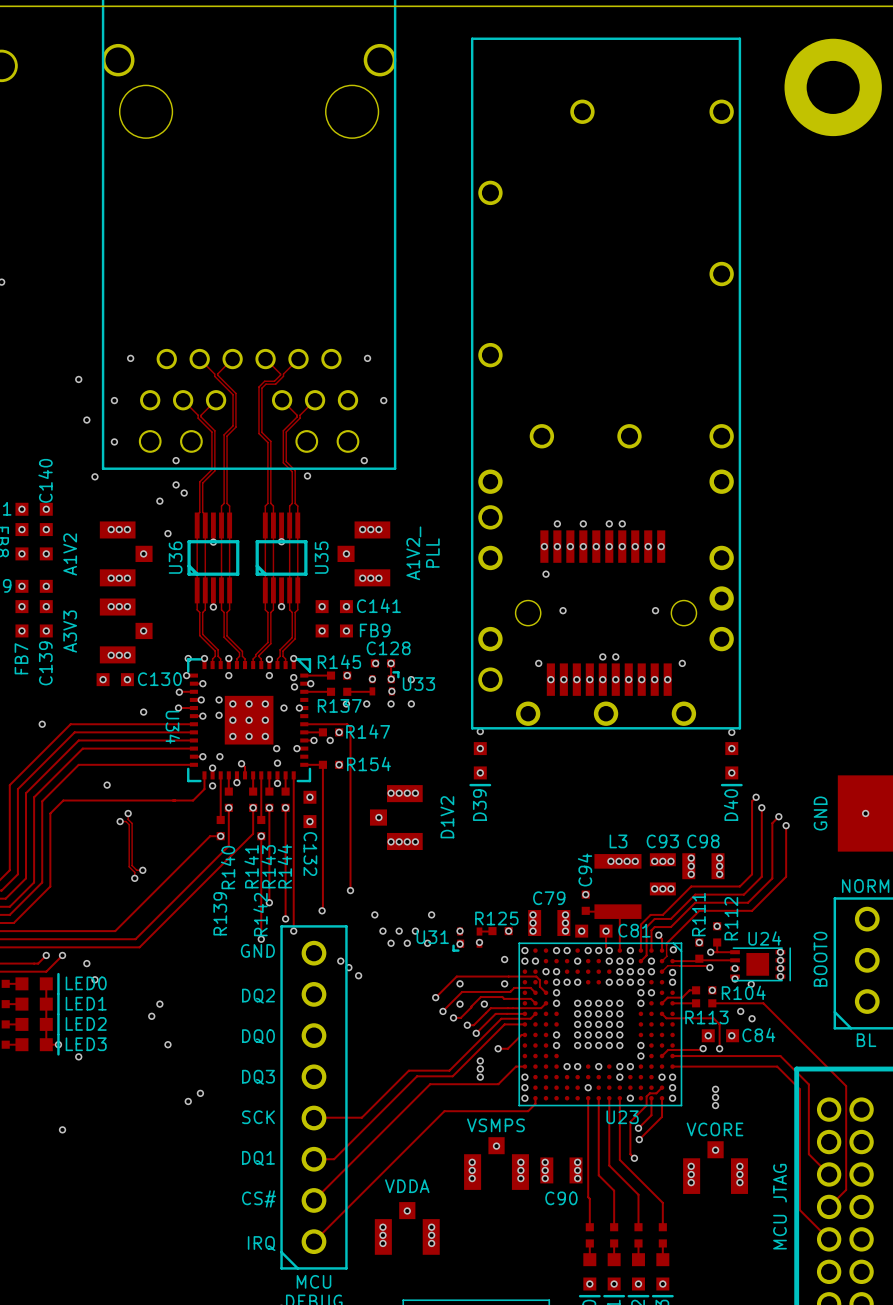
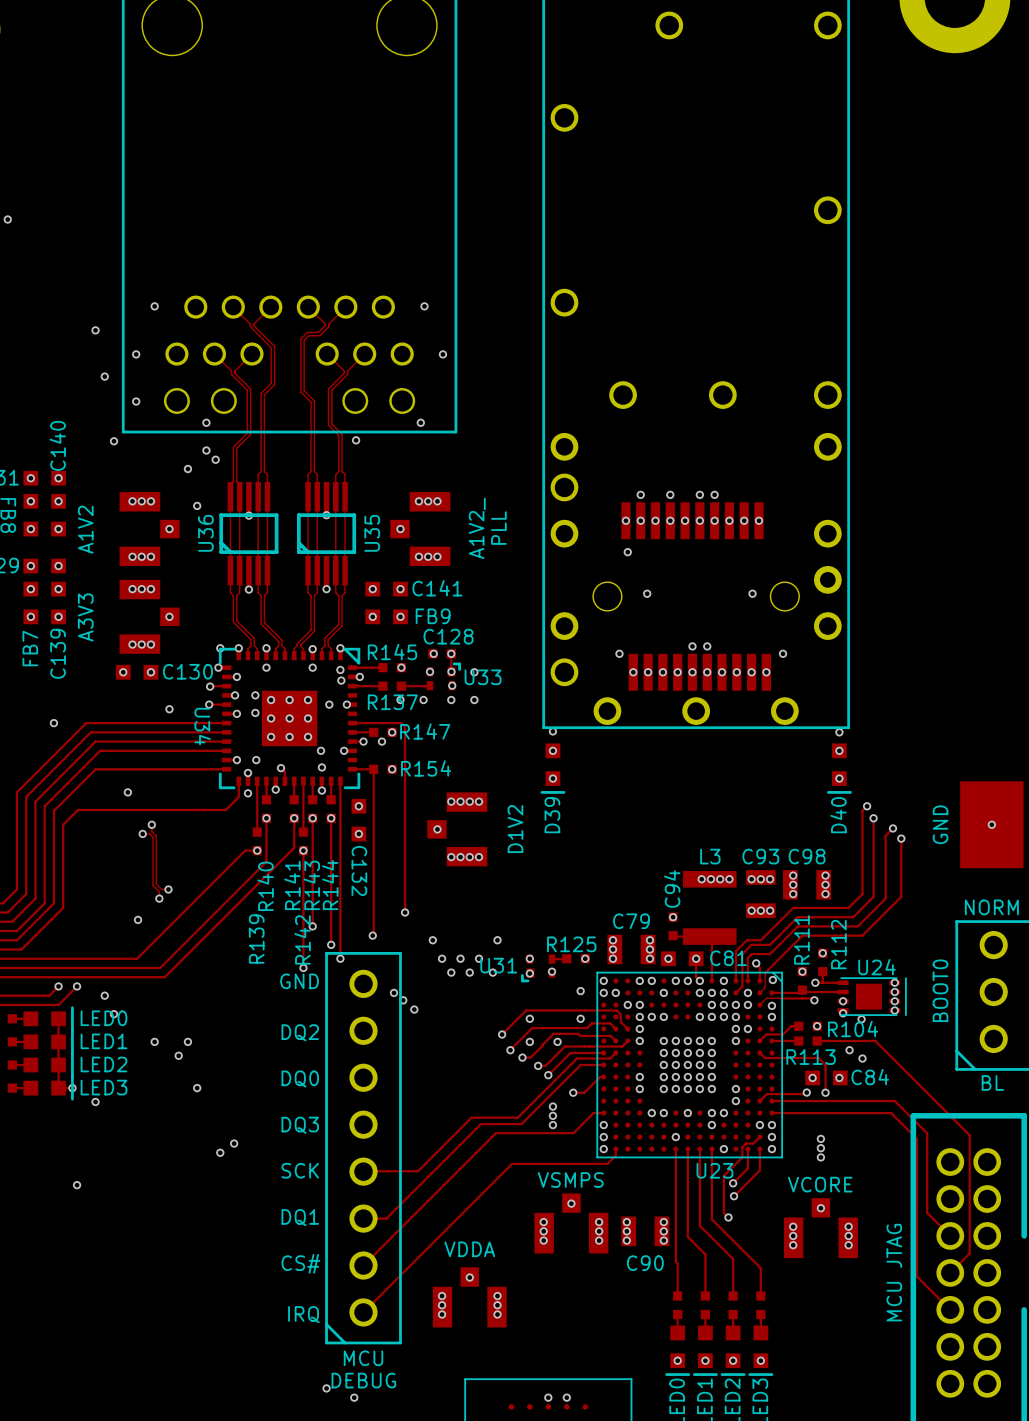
via: none -> (138, 919)
via: none -> (154, 1041)

